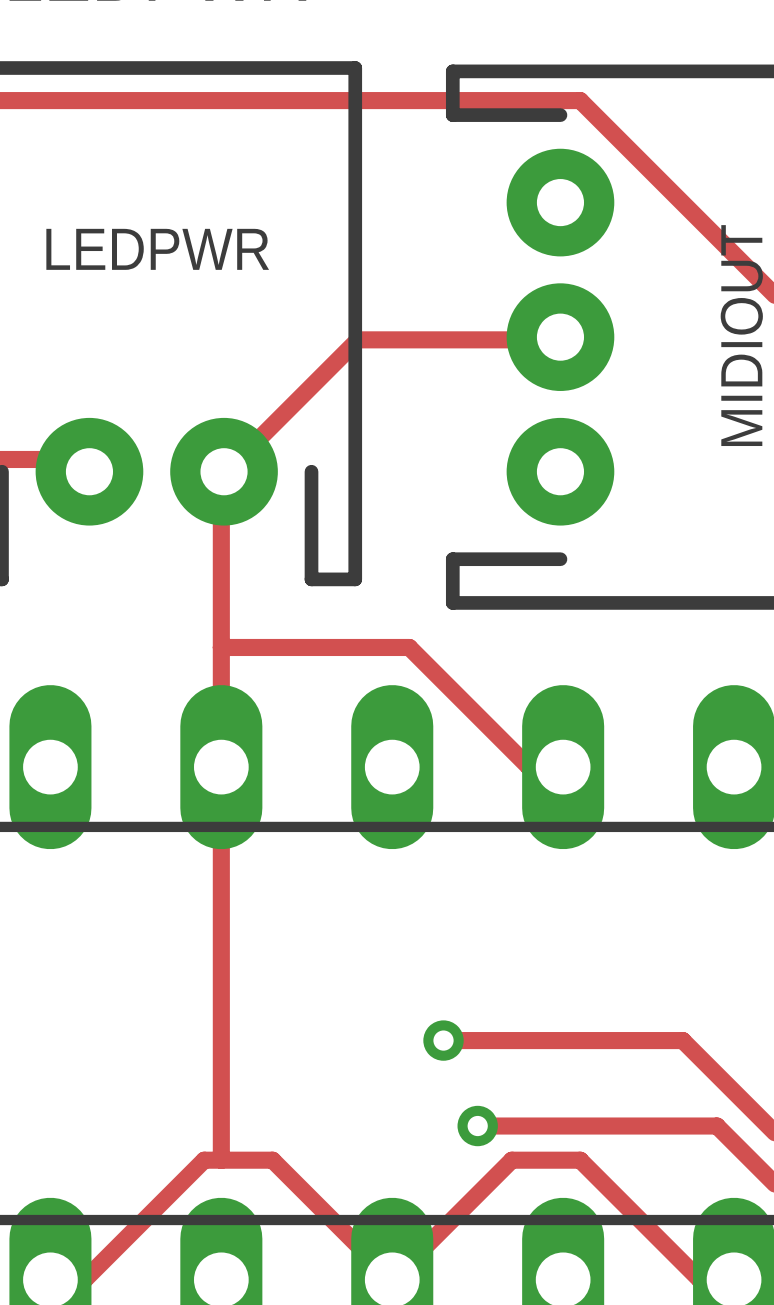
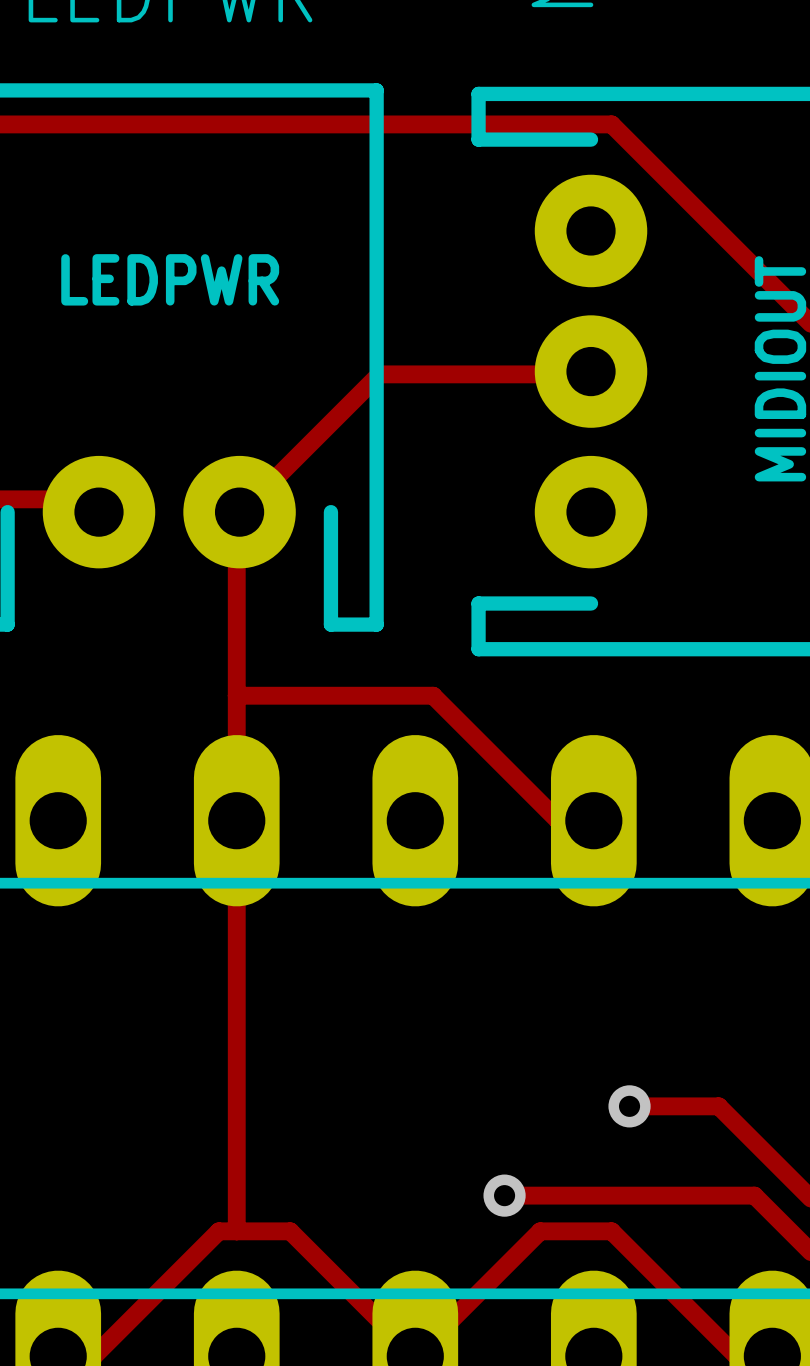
track: (443, 1040) (597, 1040) -> none
via position: (443, 1040) -> (629, 1106)

